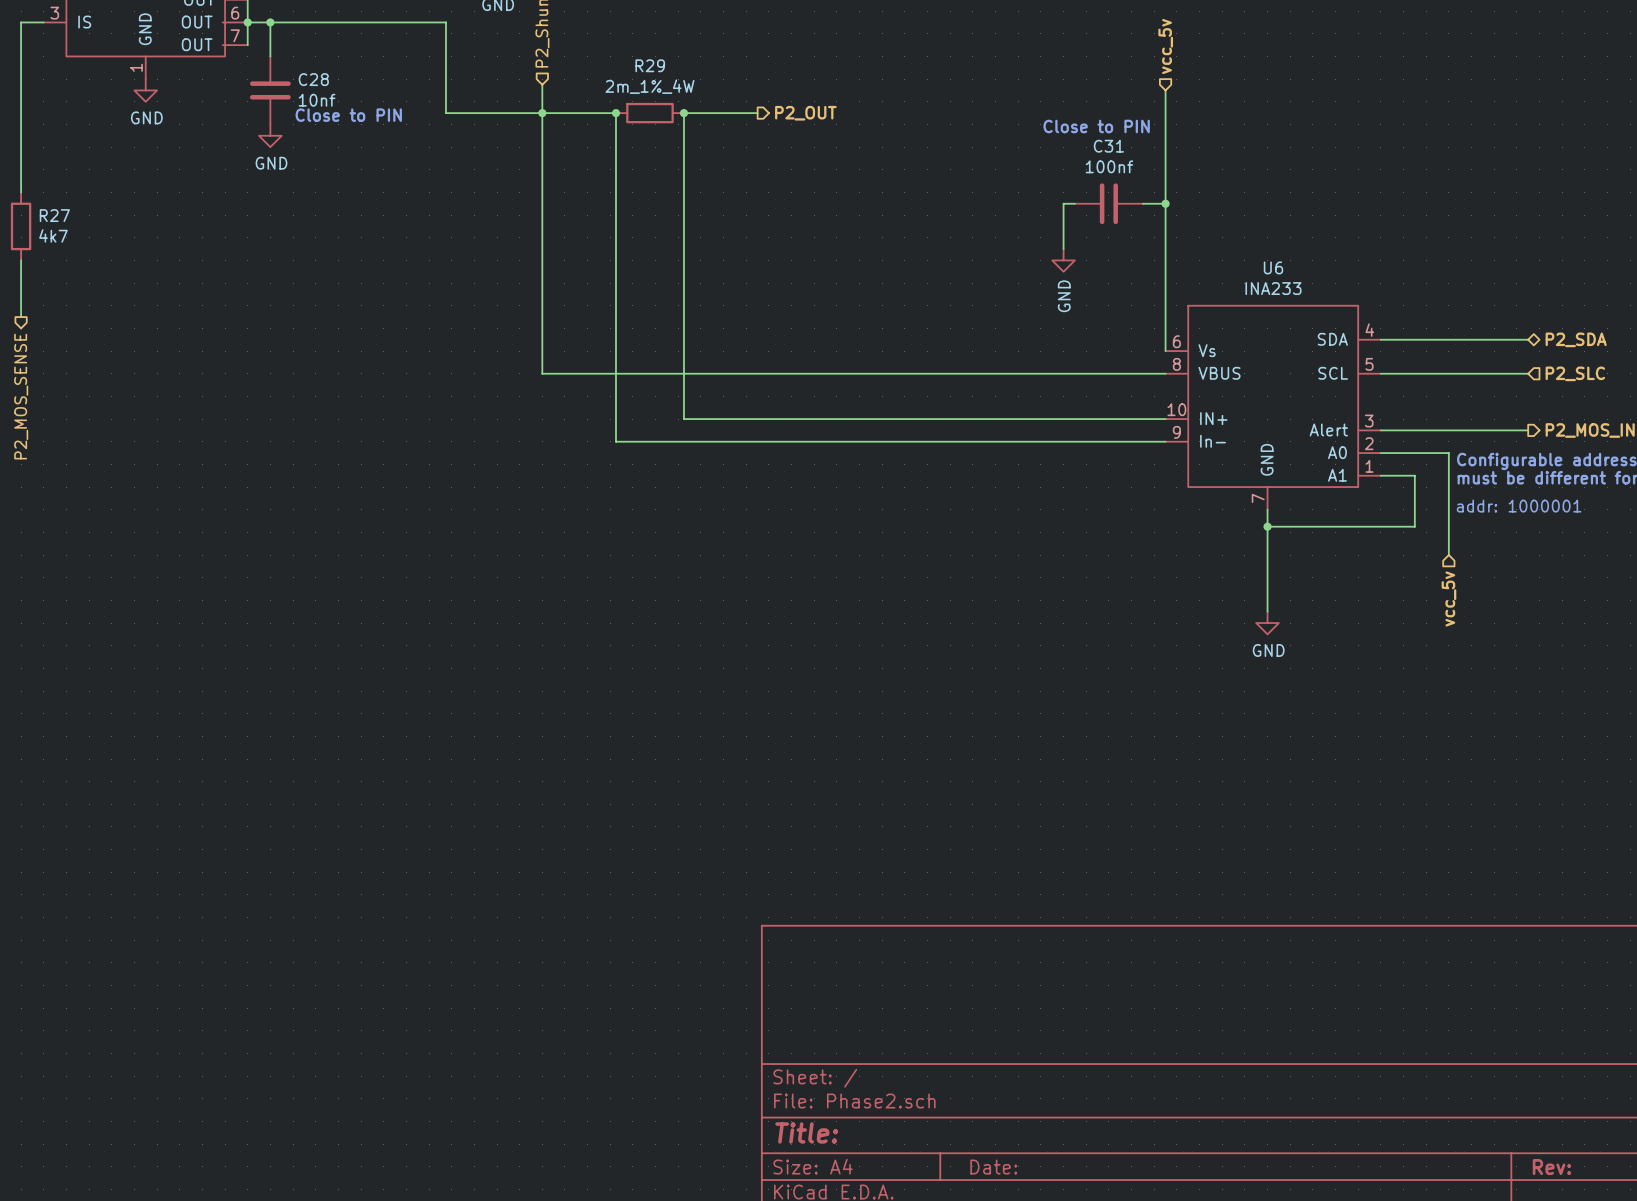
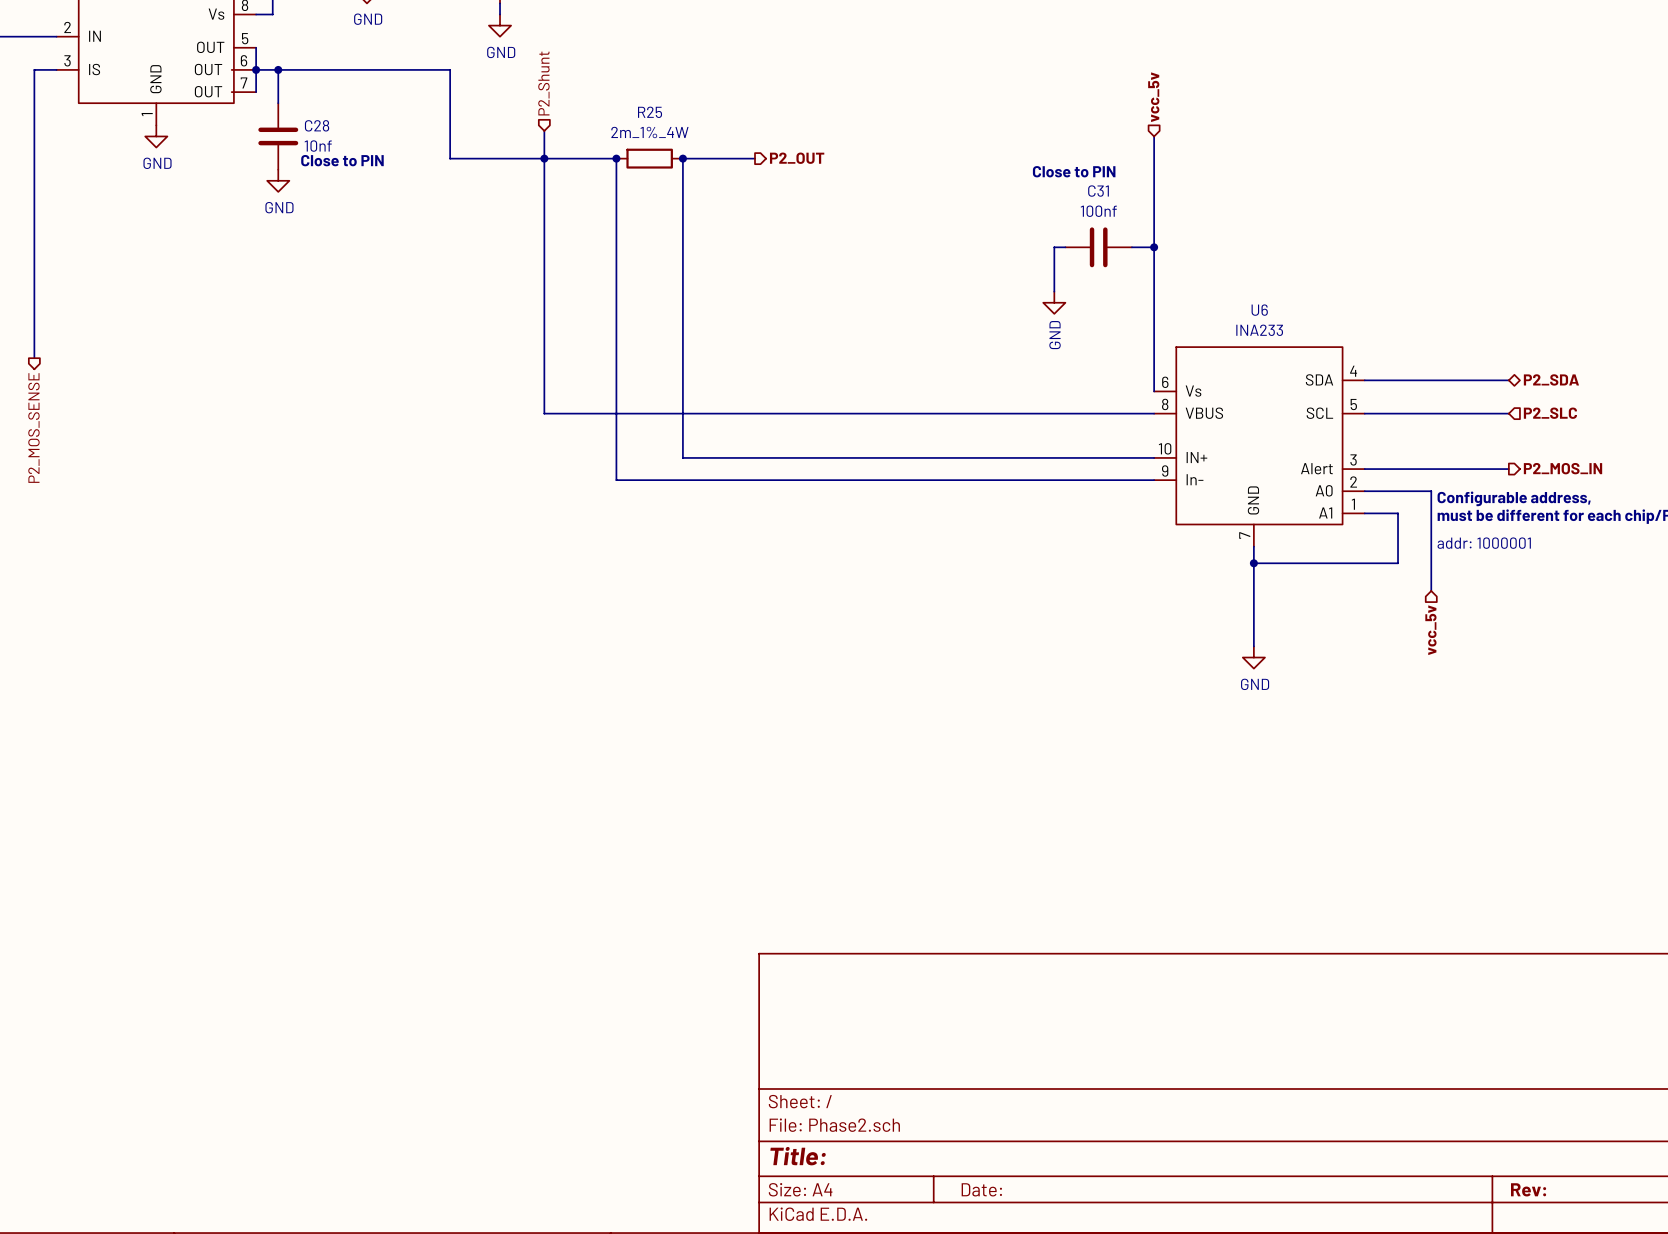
R29 name: R29 (650, 65) -> R25 (650, 112)
wire: none -> (34, 236) (34, 302)
R27: 4k7 (21, 226) -> none

